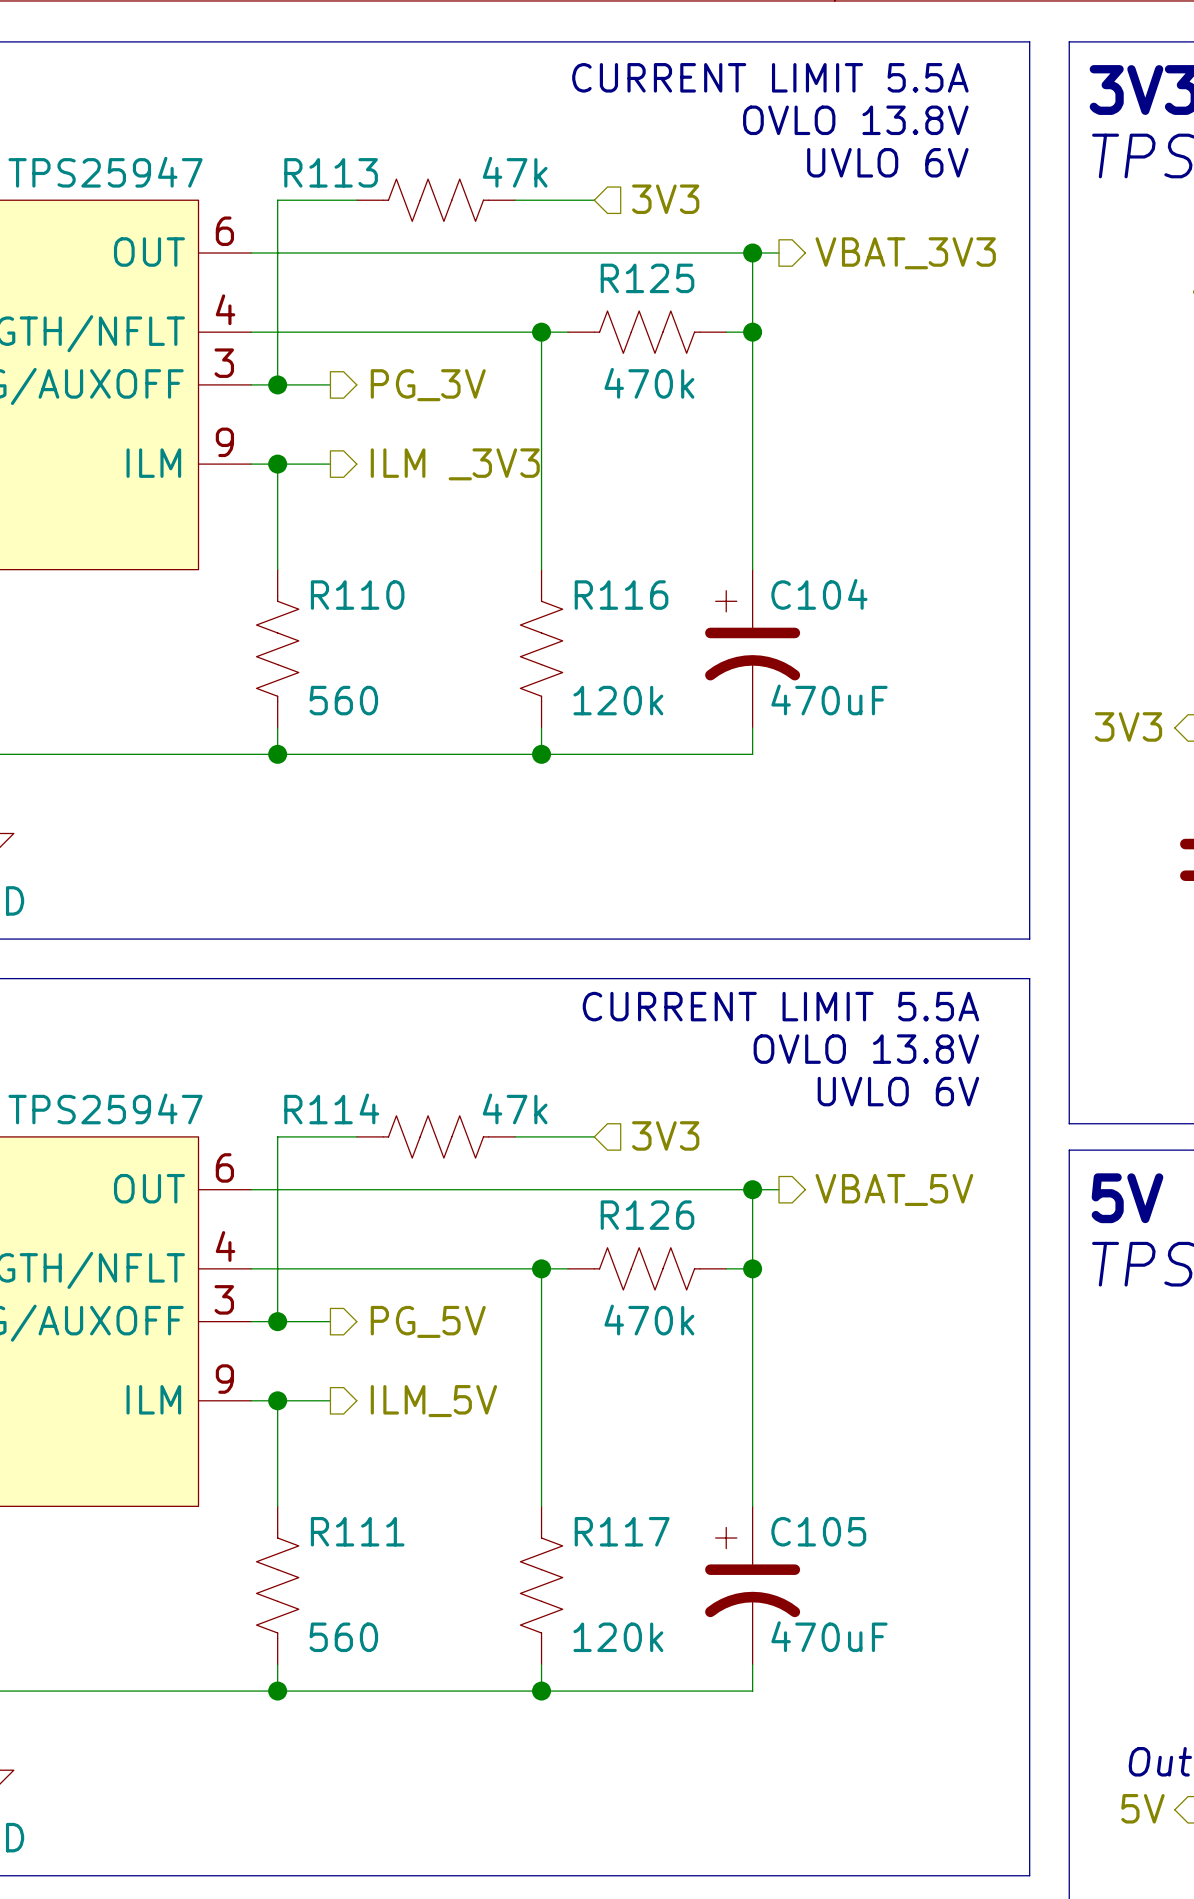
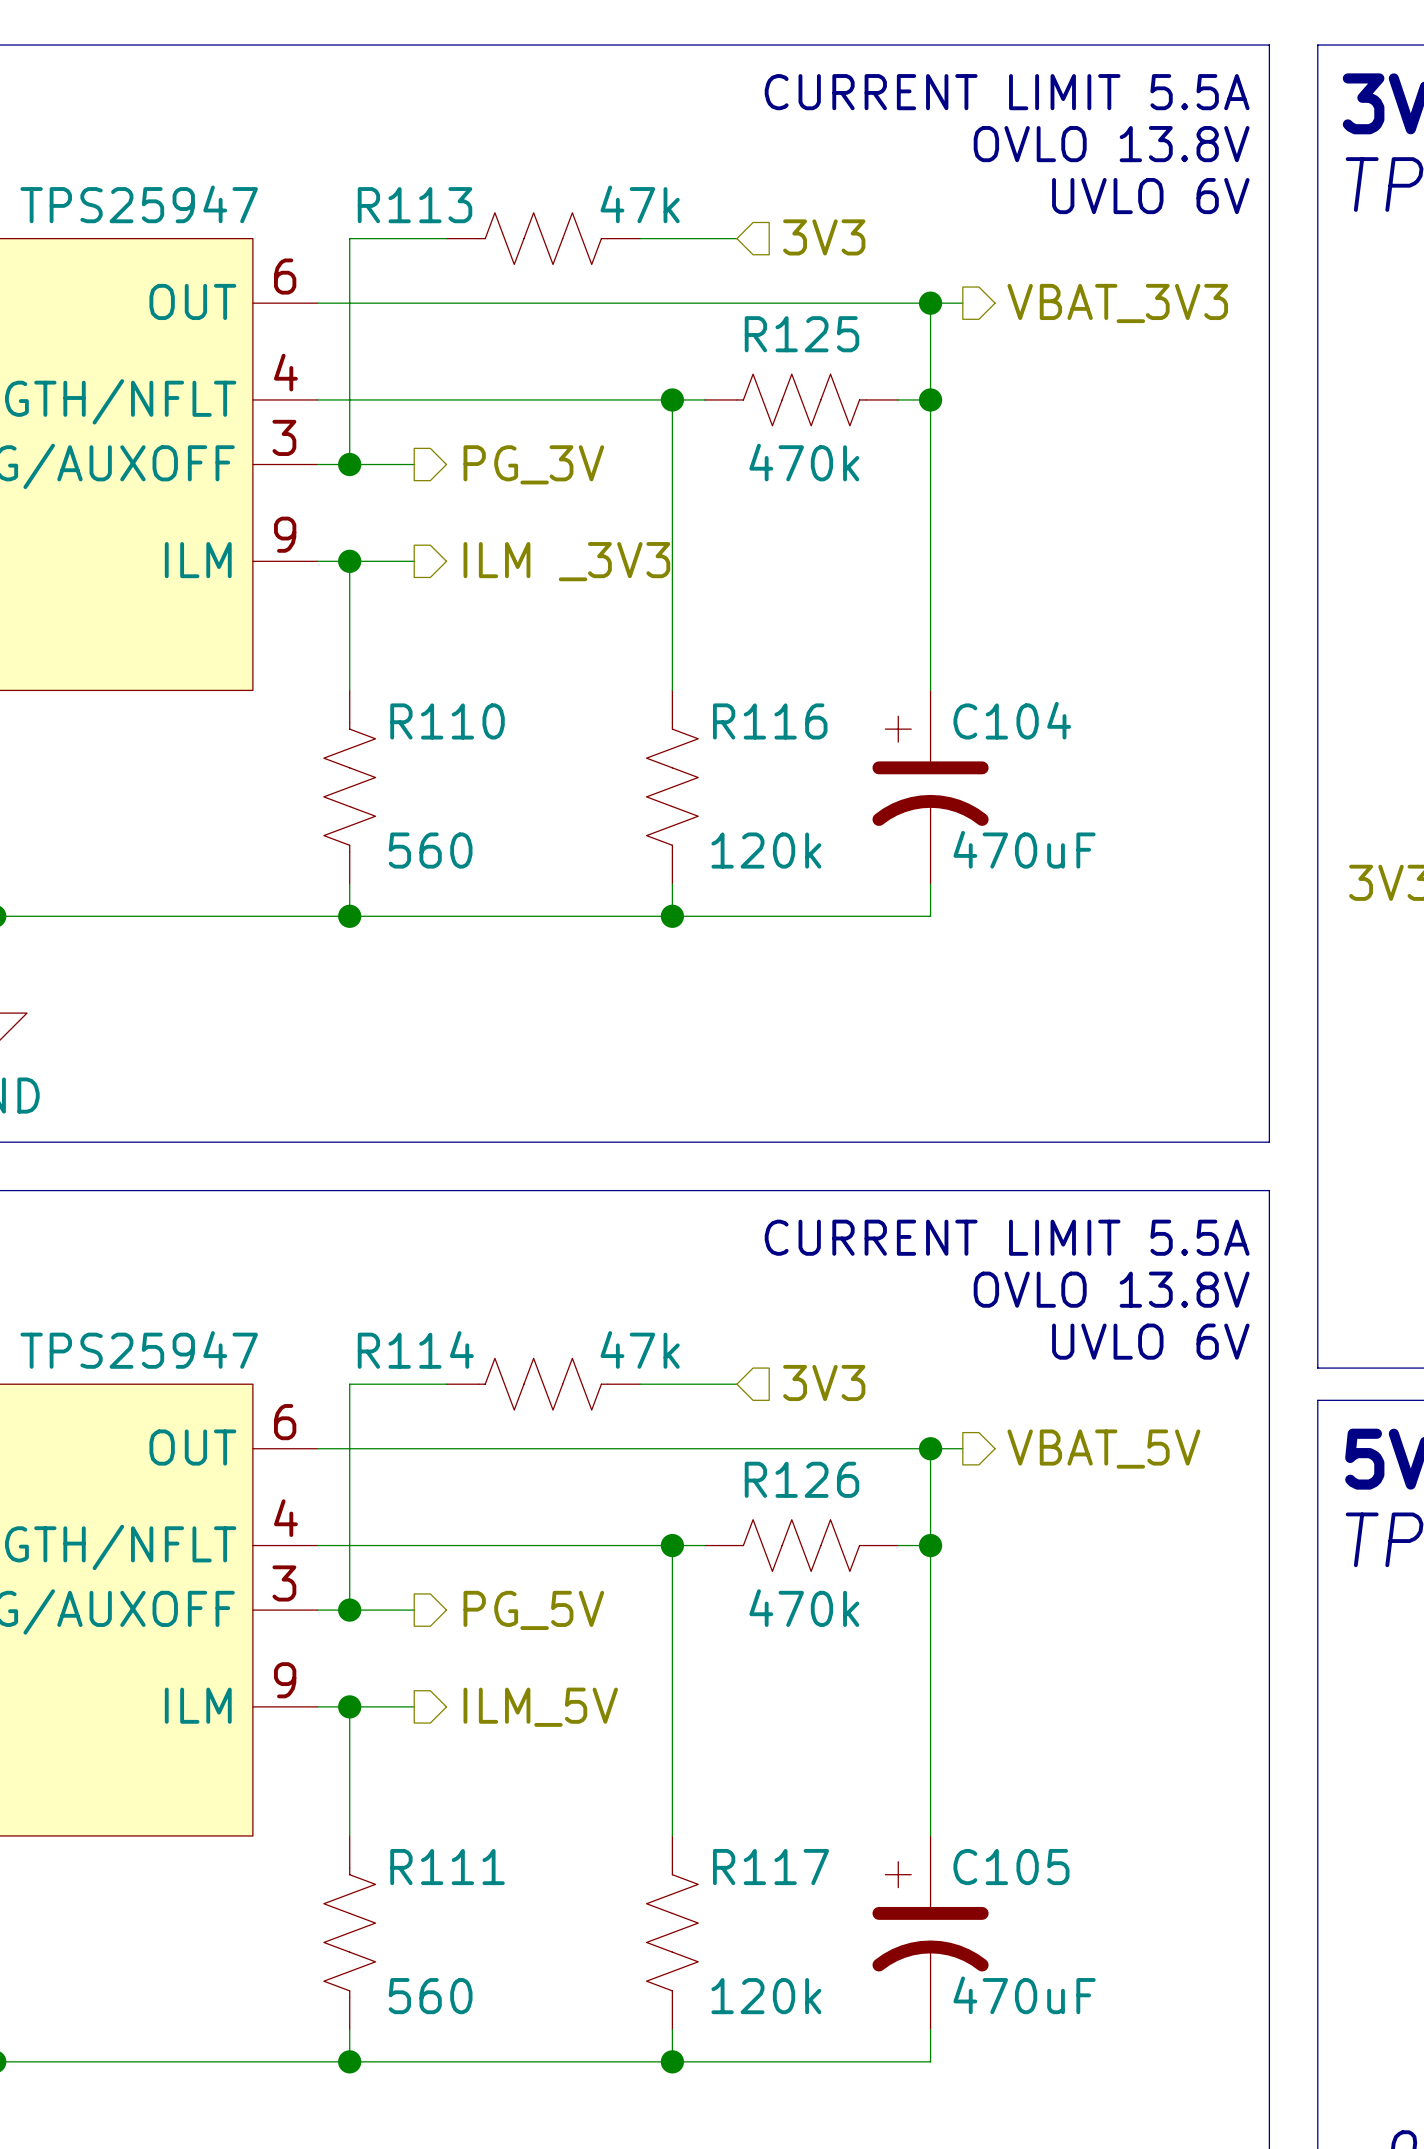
text position: CURRENT LIMIT 5.5A (770, 77) -> CURRENT LIMIT 5.5A (1007, 92)
text position: OVLO 13.8V (855, 120) -> OVLO 13.8V (1111, 144)
text position: UVLO 6V (887, 162) -> UVLO 6V (1150, 196)
text position: CURRENT LIMIT 5.5A (780, 1006) -> CURRENT LIMIT 5.5A (1007, 1237)
text position: OVLO 13.8V (866, 1049) -> OVLO 13.8V (1111, 1289)
text position: UVLO 6V (898, 1091) -> UVLO 6V (1150, 1341)

